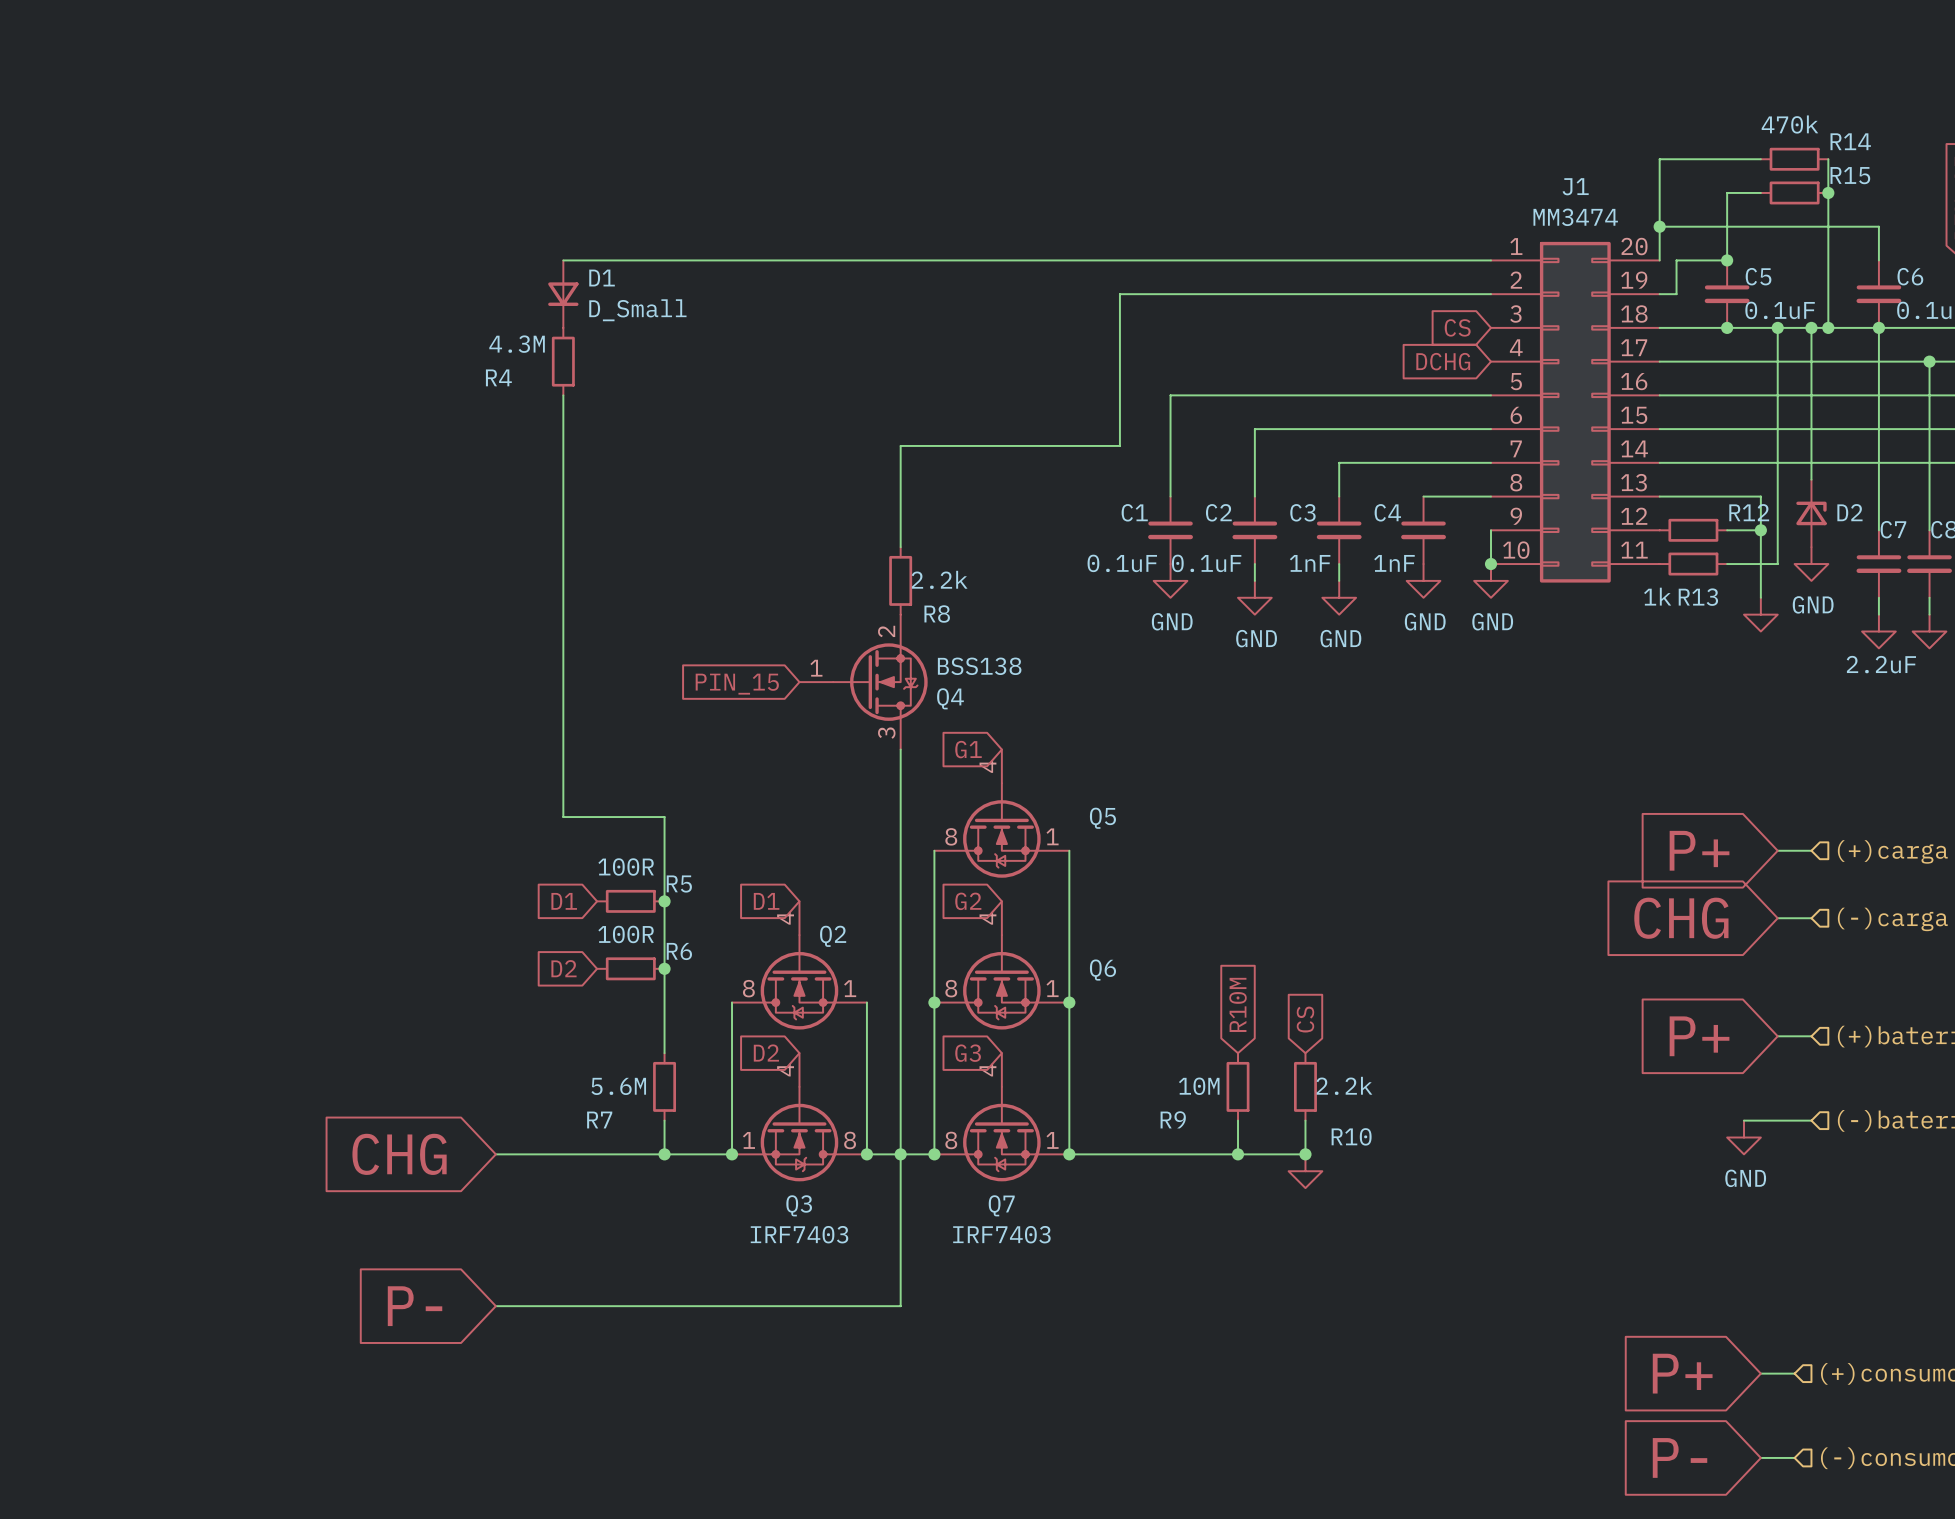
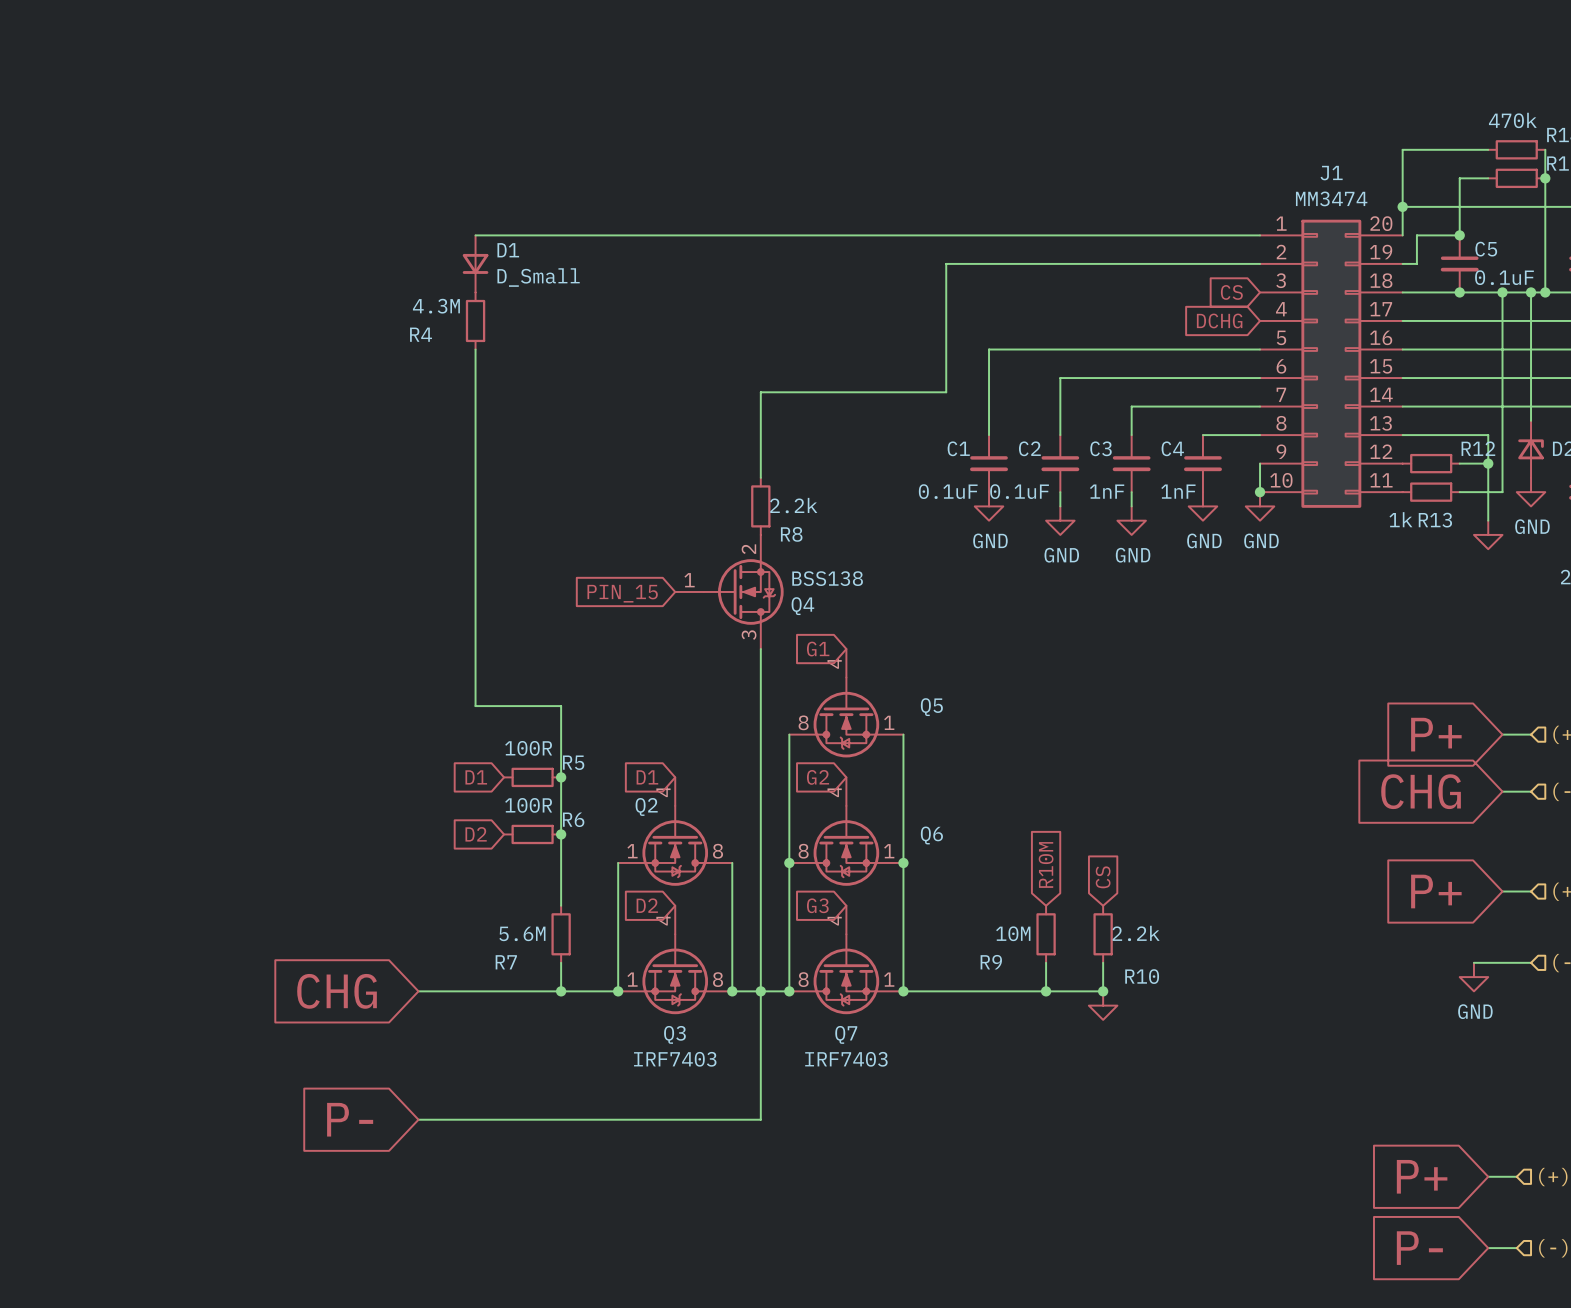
Q2 flip: as is (799, 982) -> left-right (675, 845)

